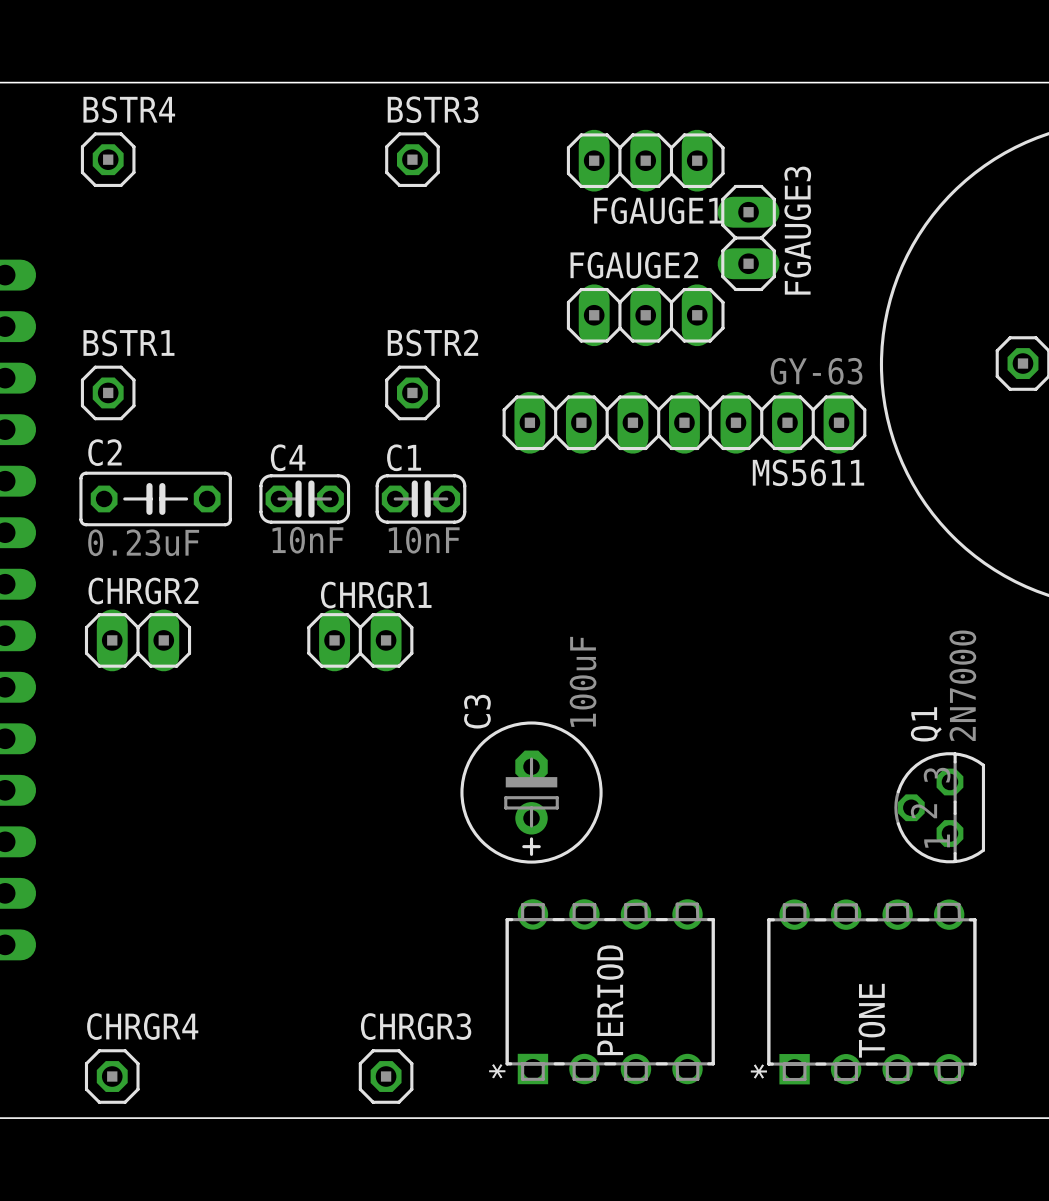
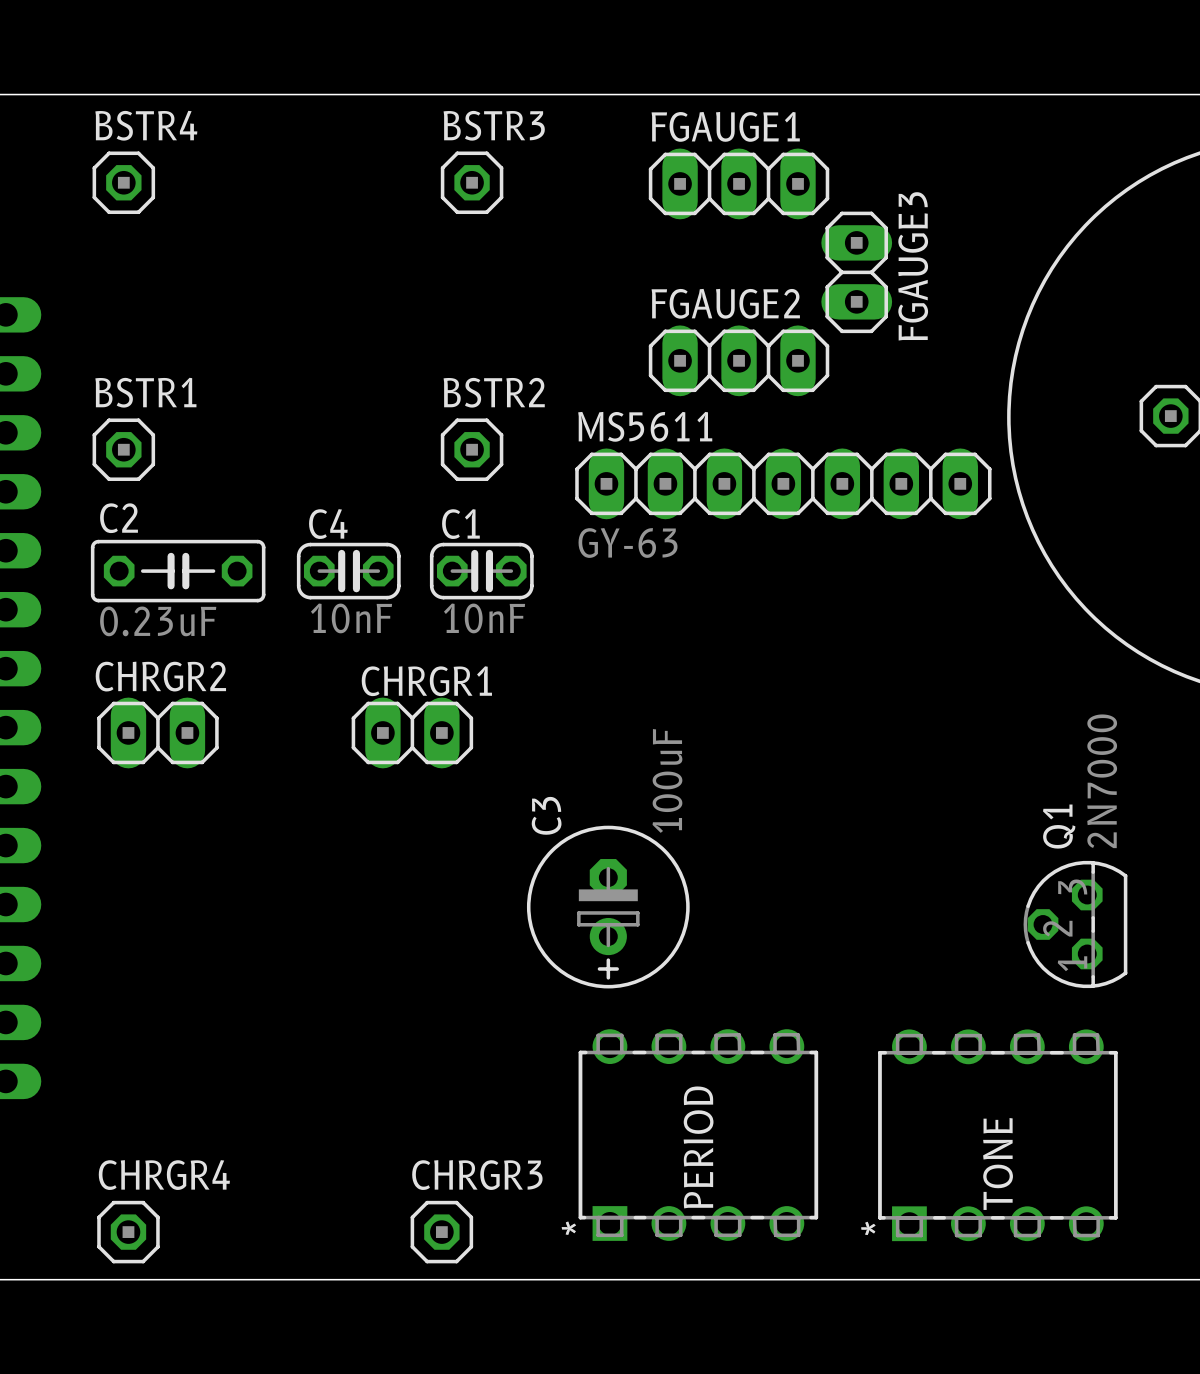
FGAUGE1 name position: FGAUGE1 (658, 210) -> FGAUGE1 (725, 126)
MS5611 value position: GY-63 (816, 371) -> GY-63 (628, 542)
MS5611 name position: MS5611 (808, 472) -> MS5611 (645, 426)

